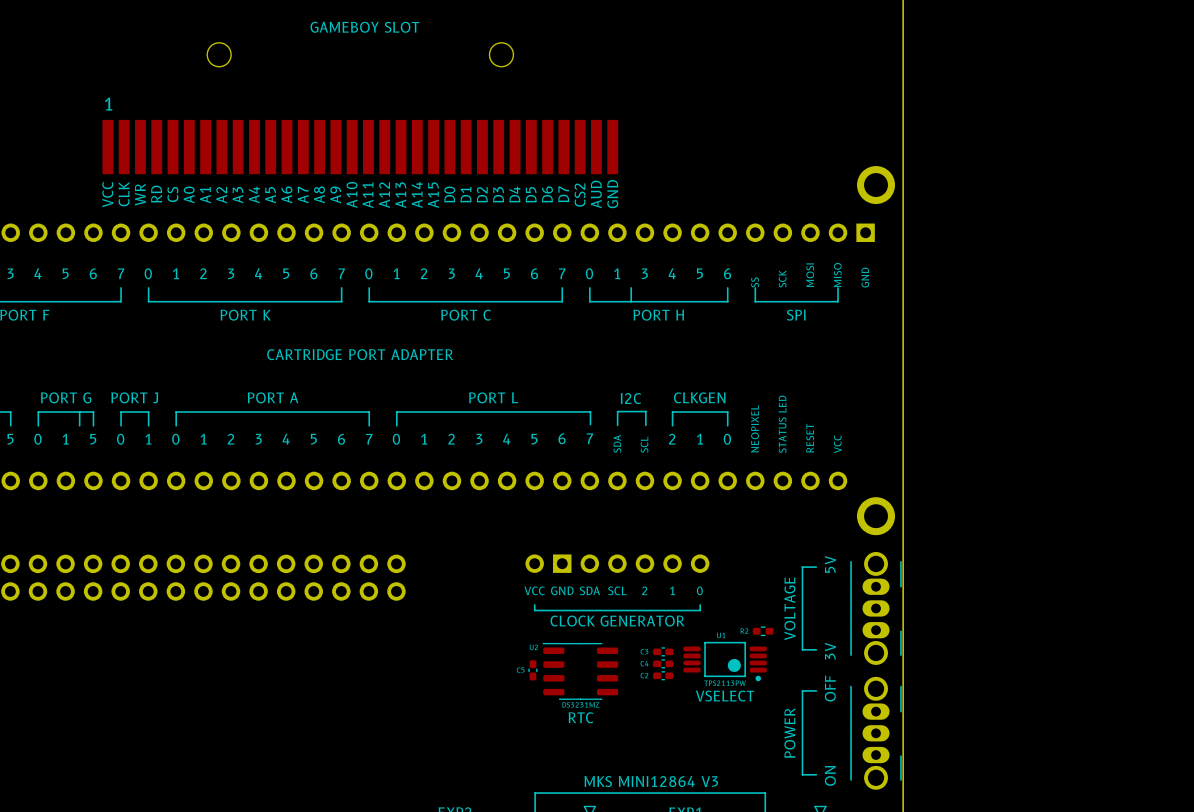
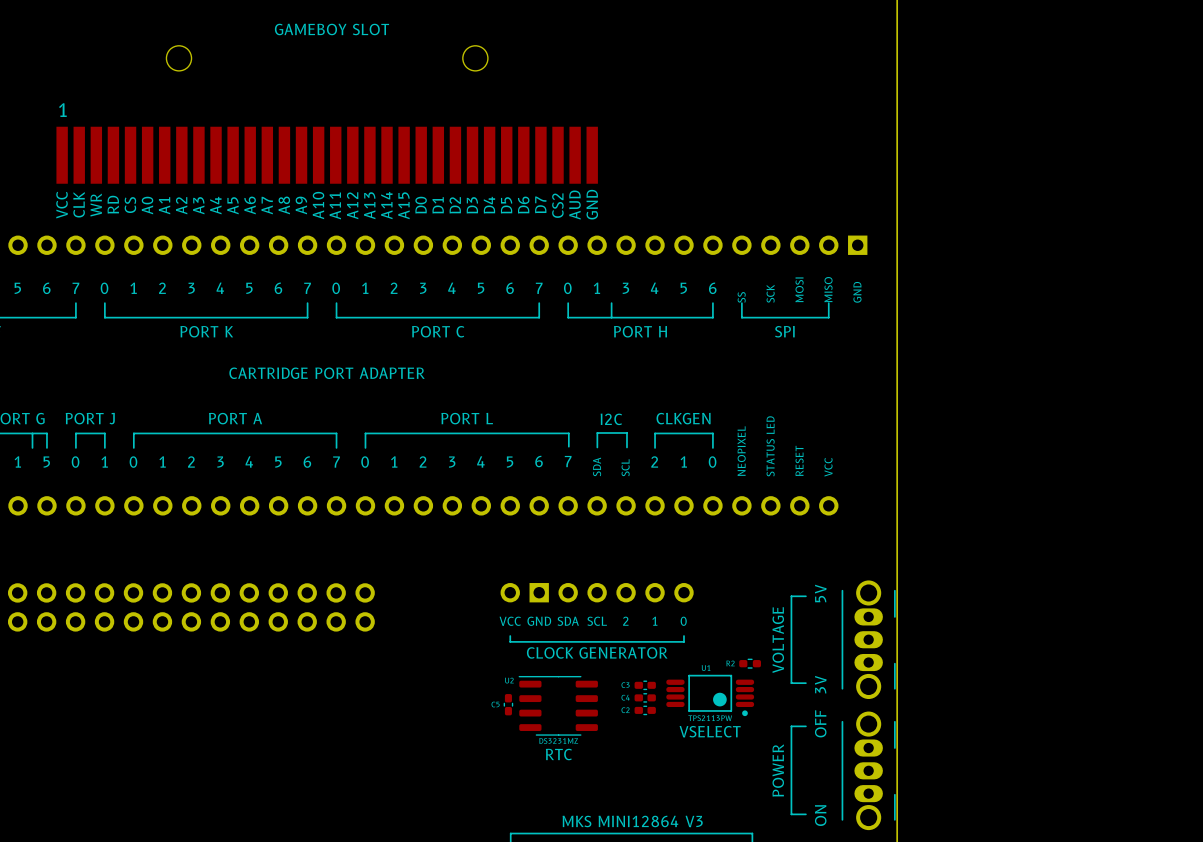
part: (876, 185) -> none
part: (876, 516) -> none

